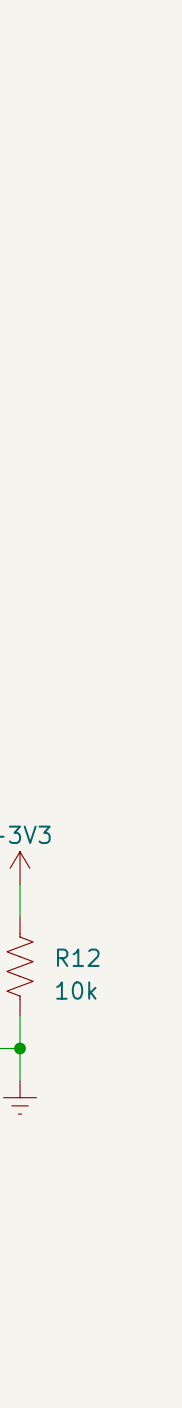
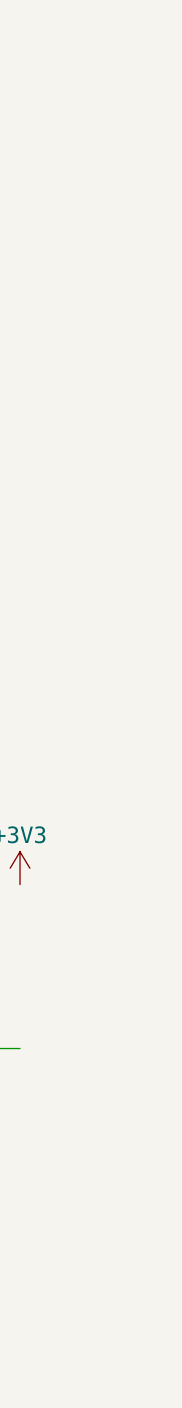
wire: (20, 884) (20, 917) -> none
R12: 10k (20, 966) -> none
wire: (20, 1015) (20, 1081) -> none
junction: (20, 1048) -> none
power symbol: (20, 1097) -> none

